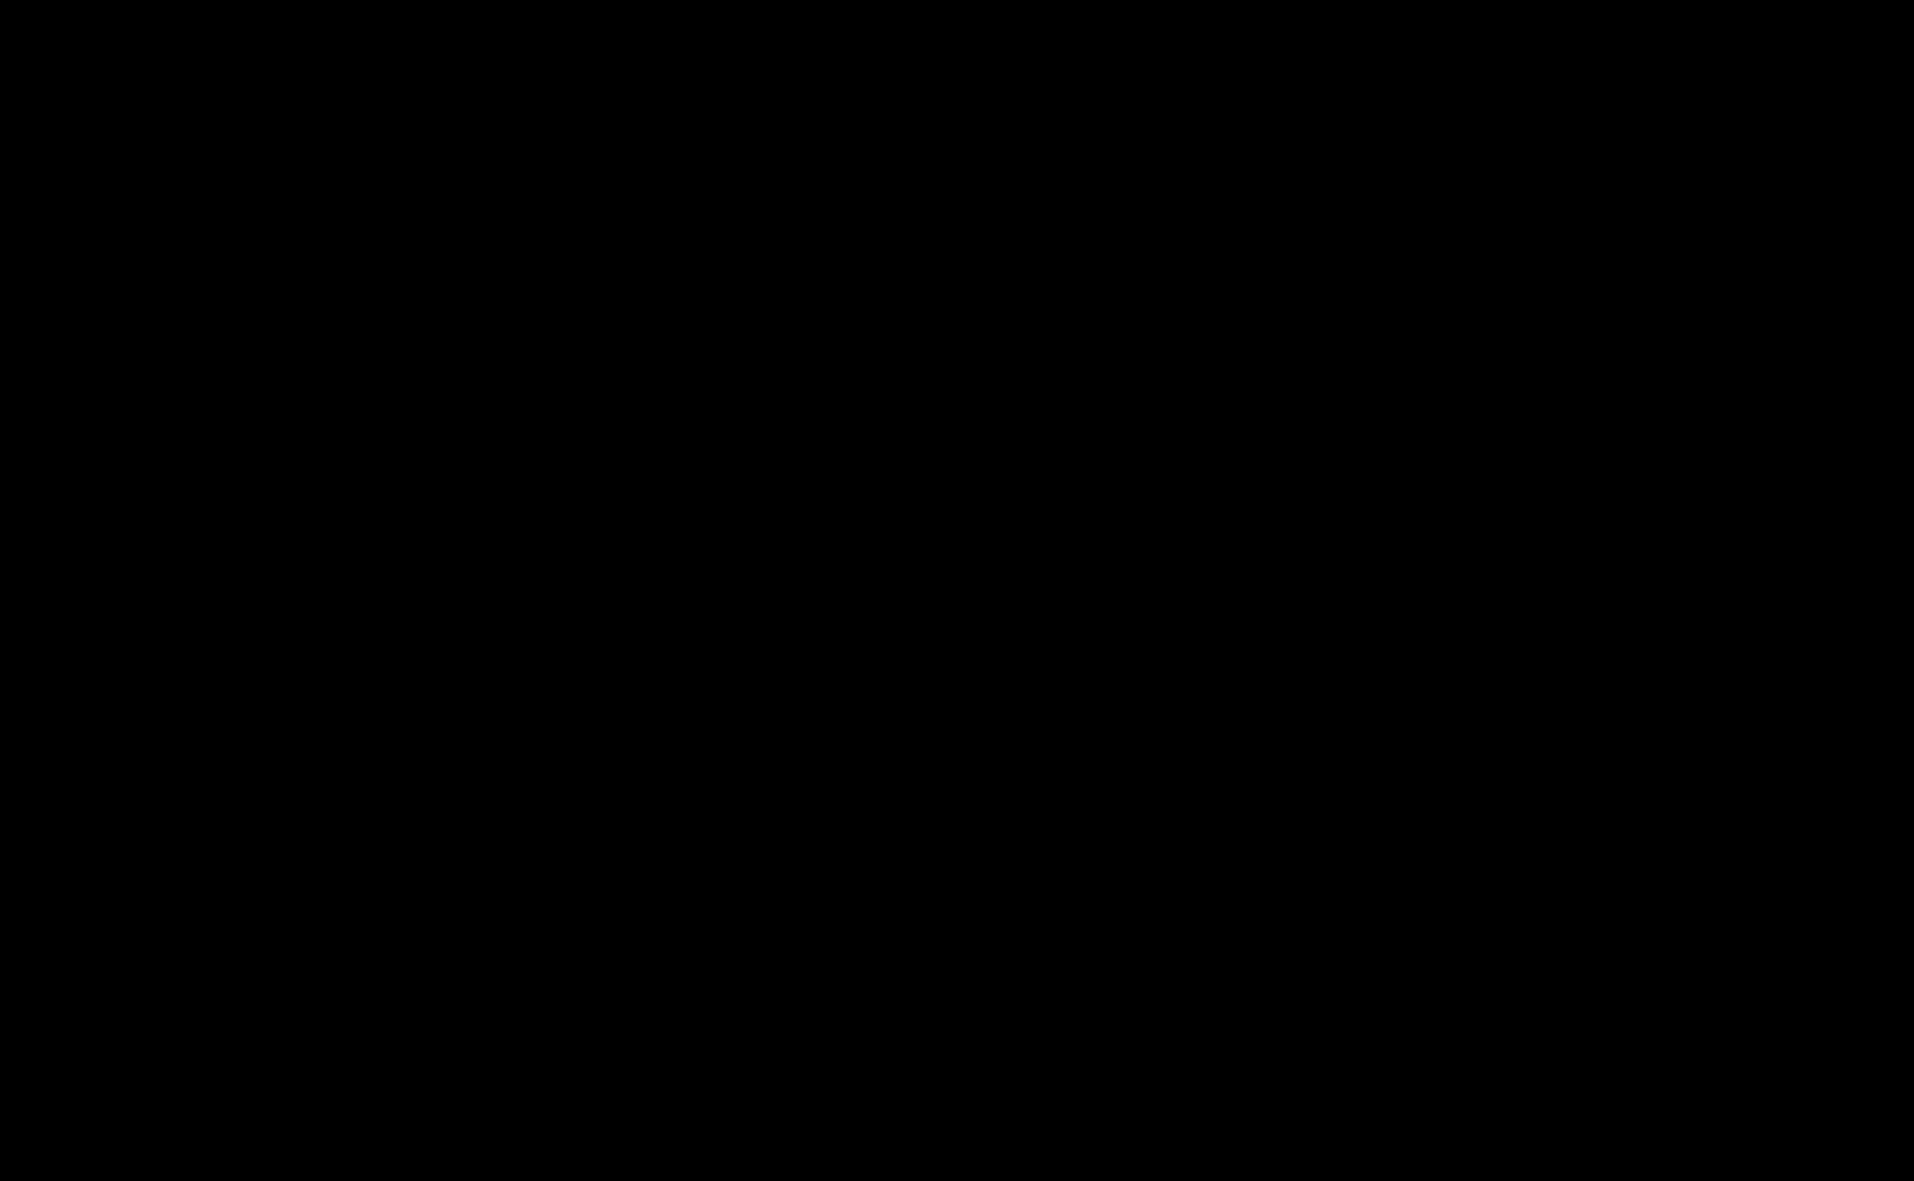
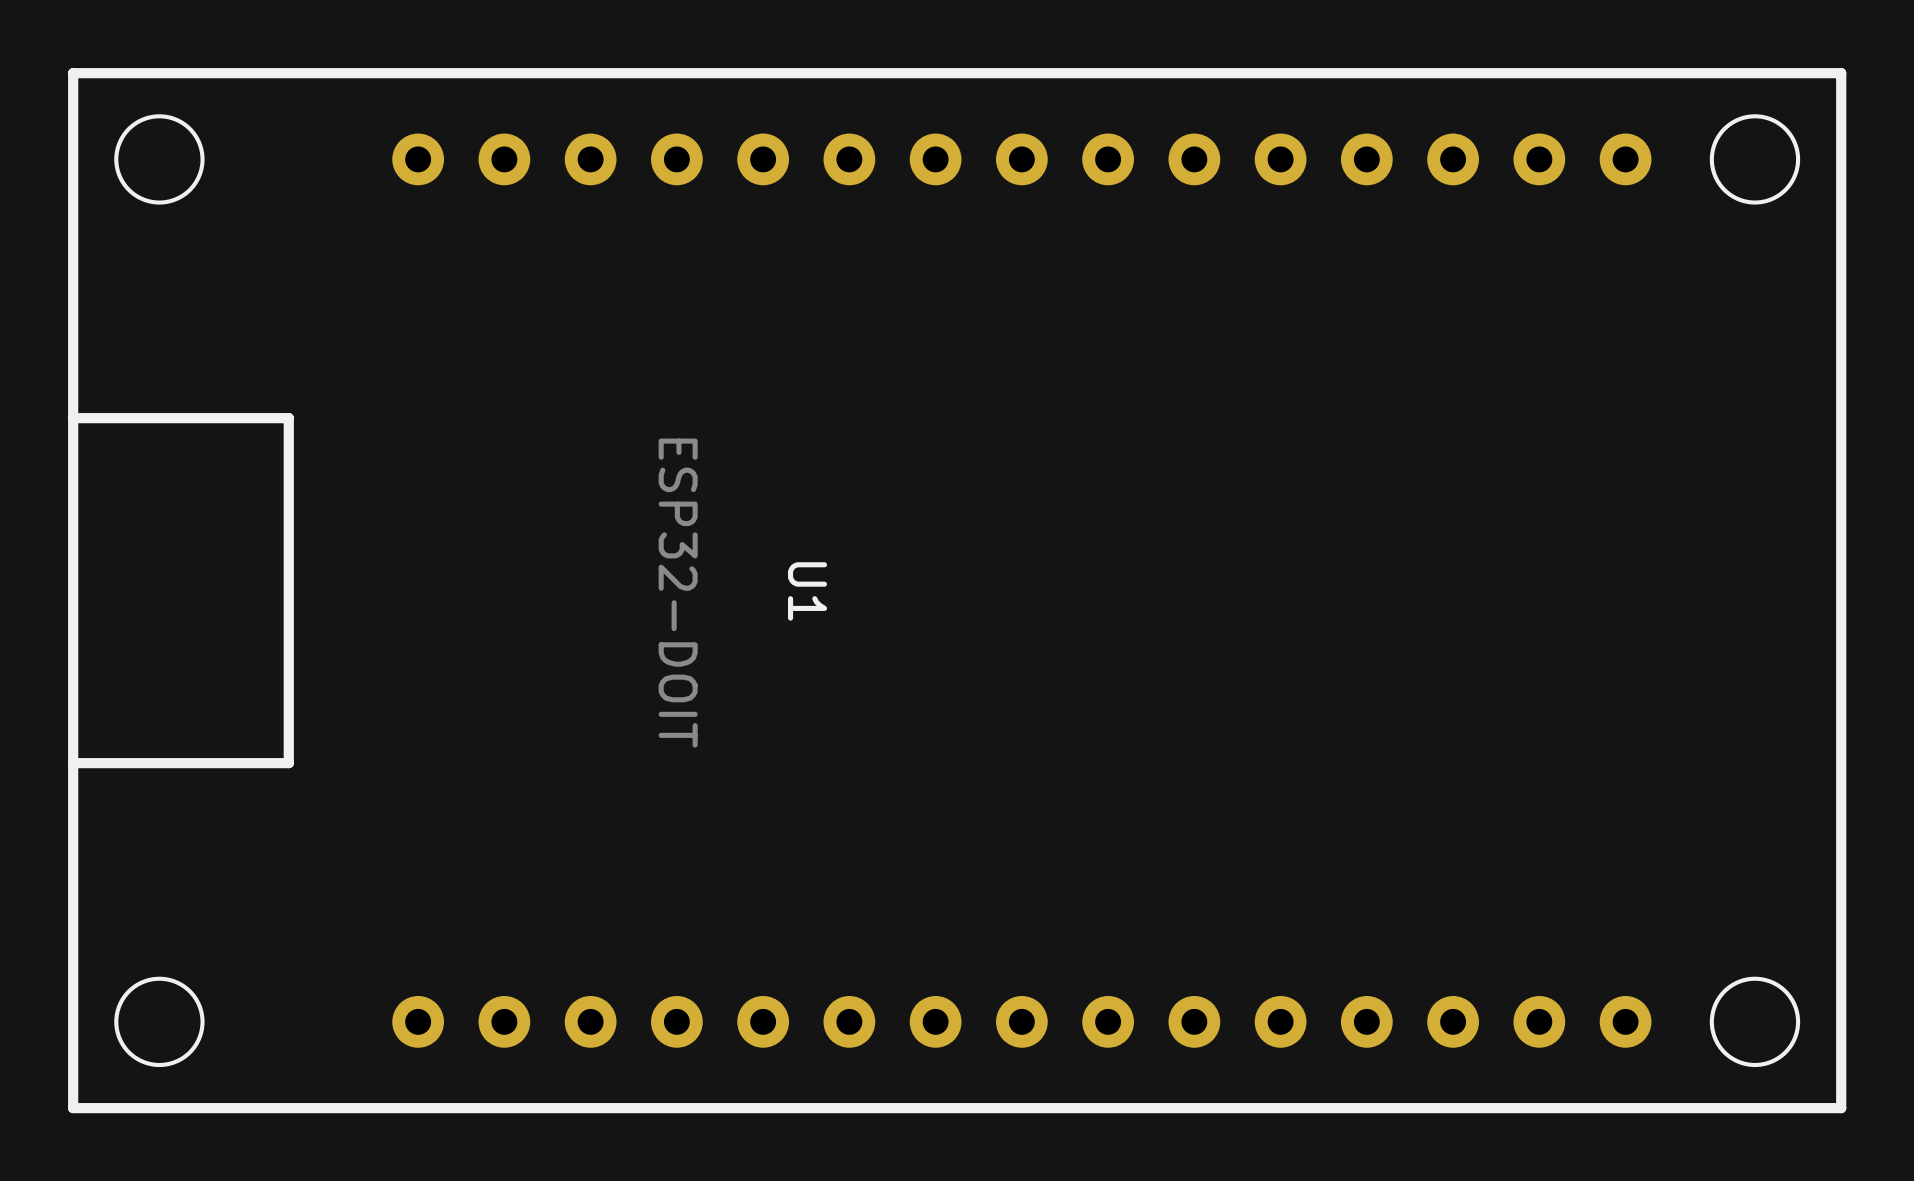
U1: none -> ESP32-DOIT (957, 590)

